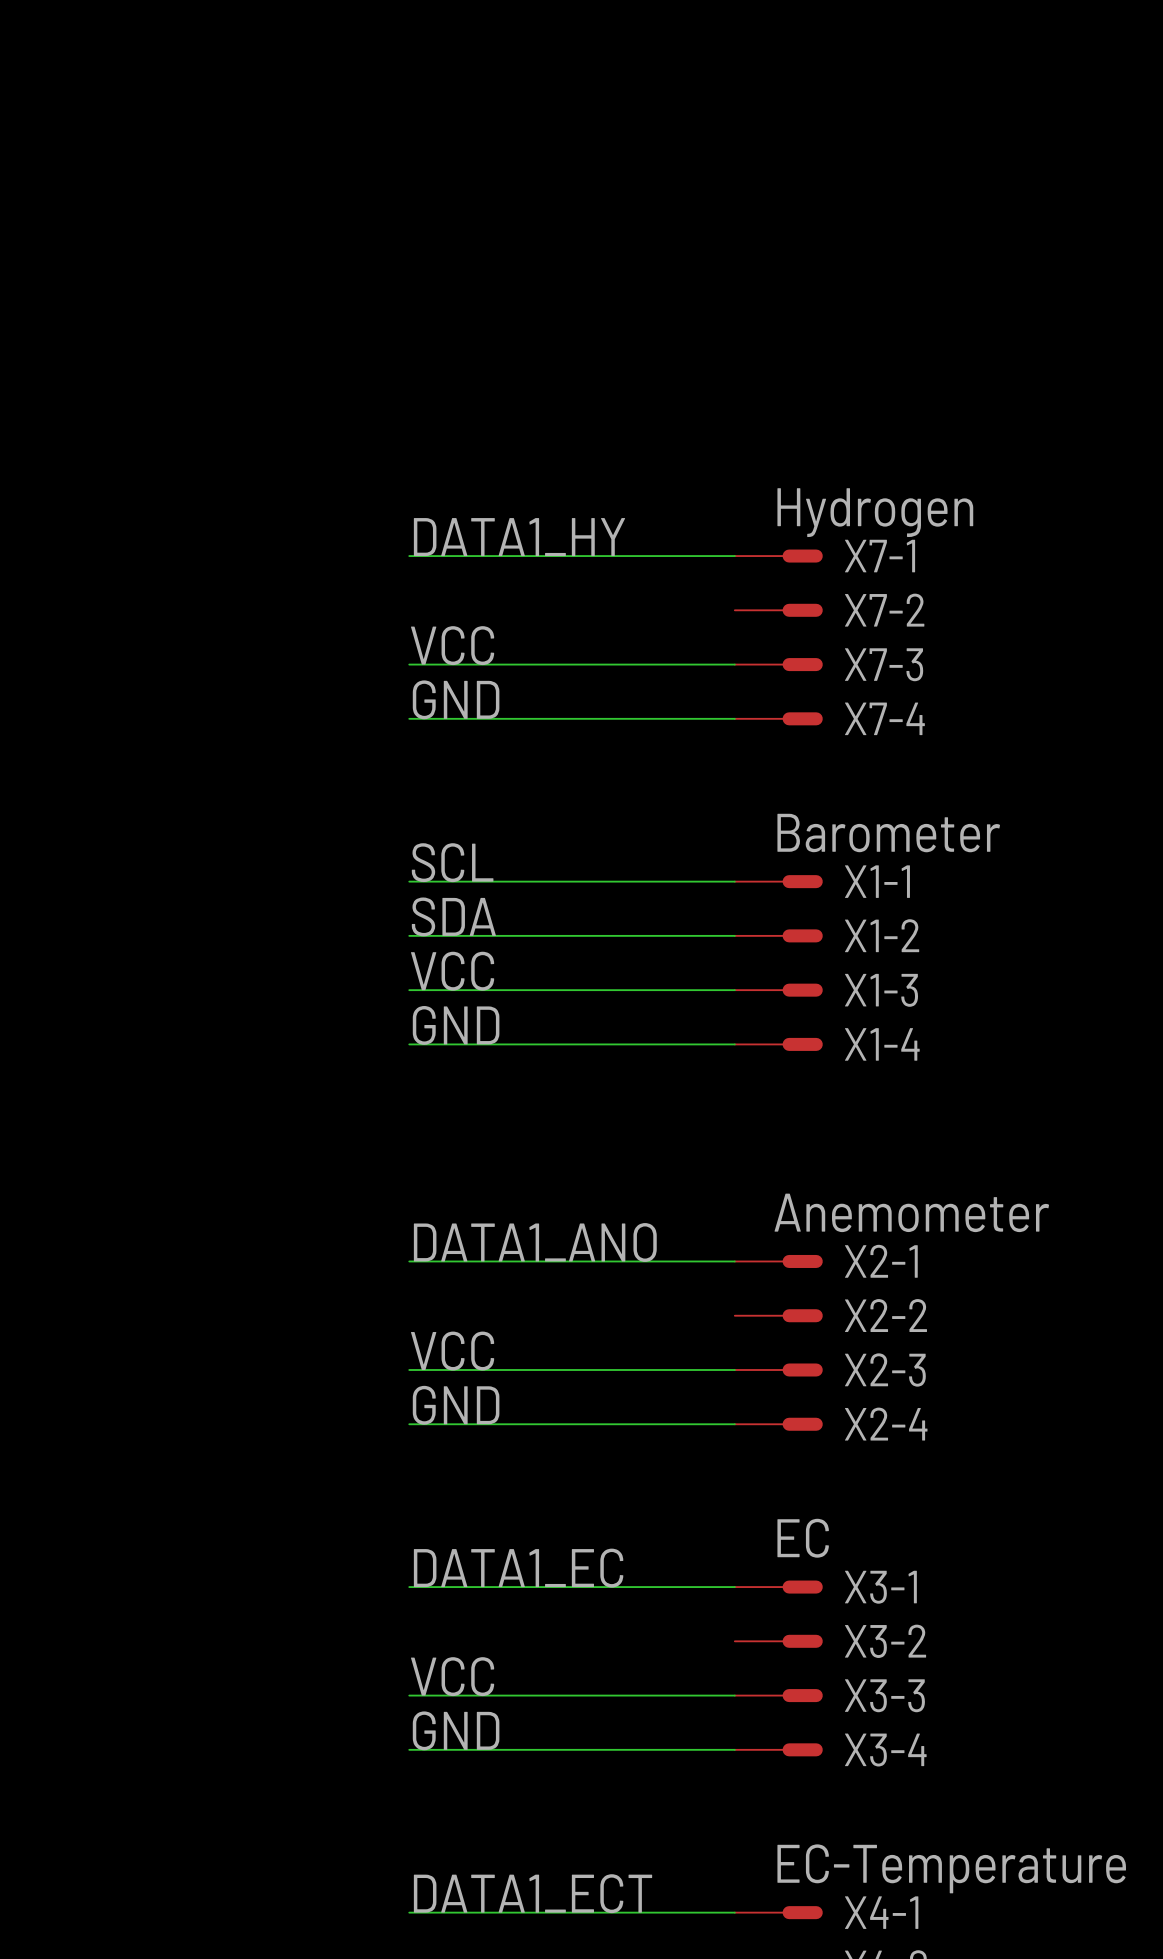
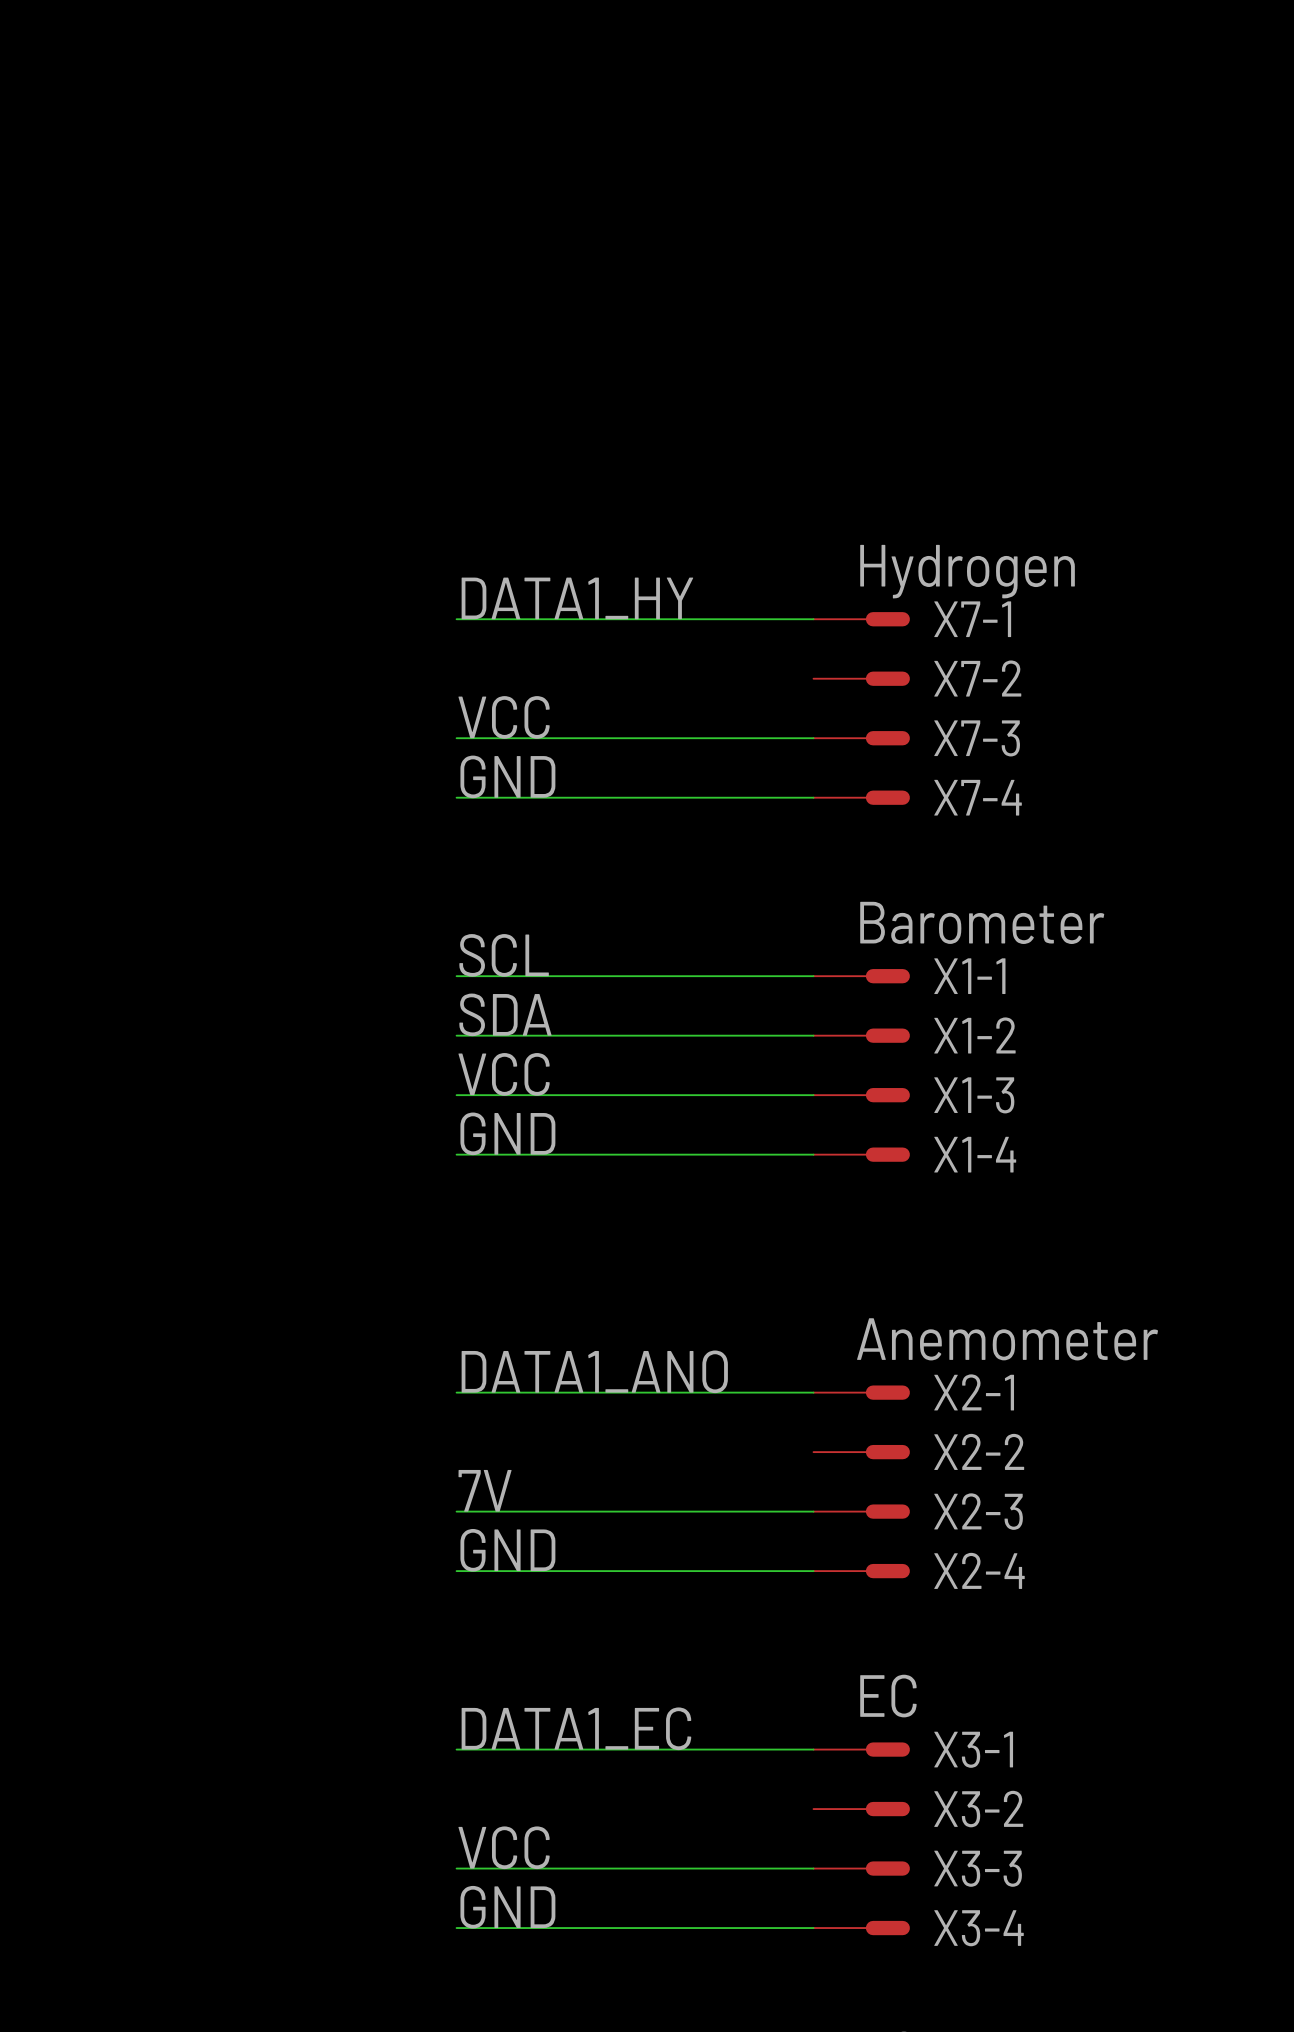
label: VCC (452, 1351) -> 7V (485, 1490)

